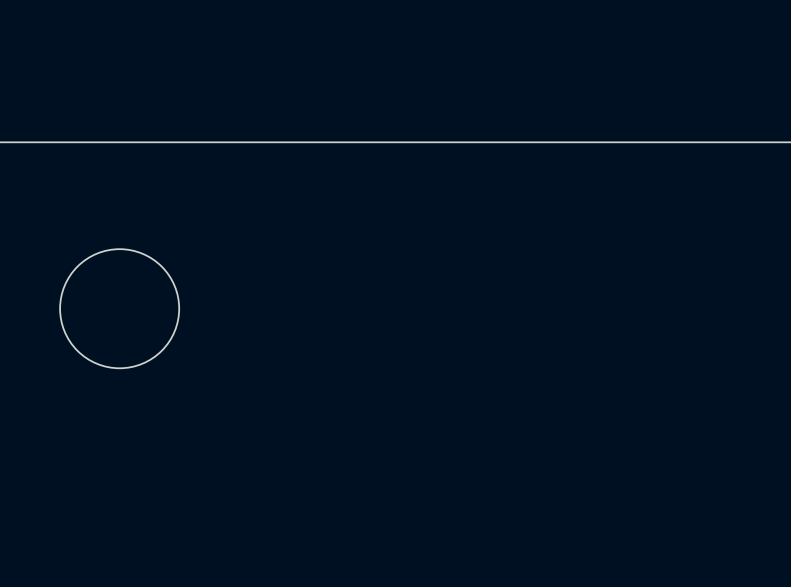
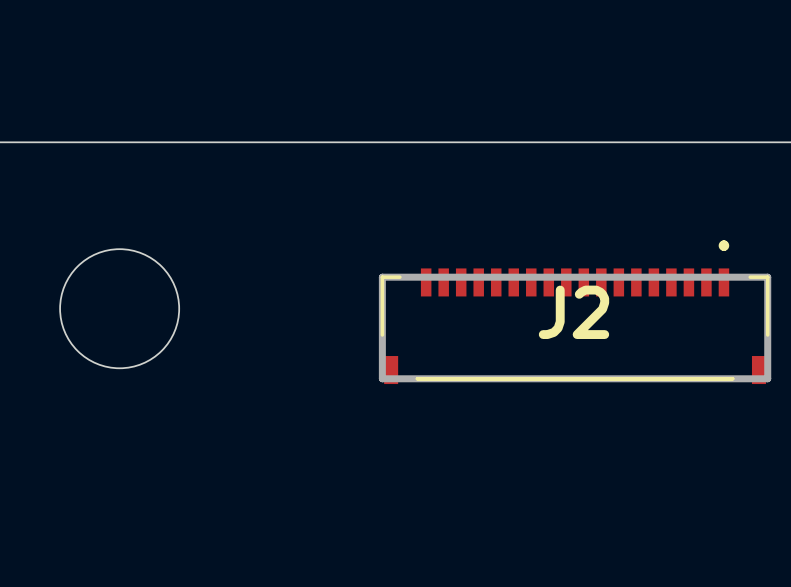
J2: none -> (575, 312)

